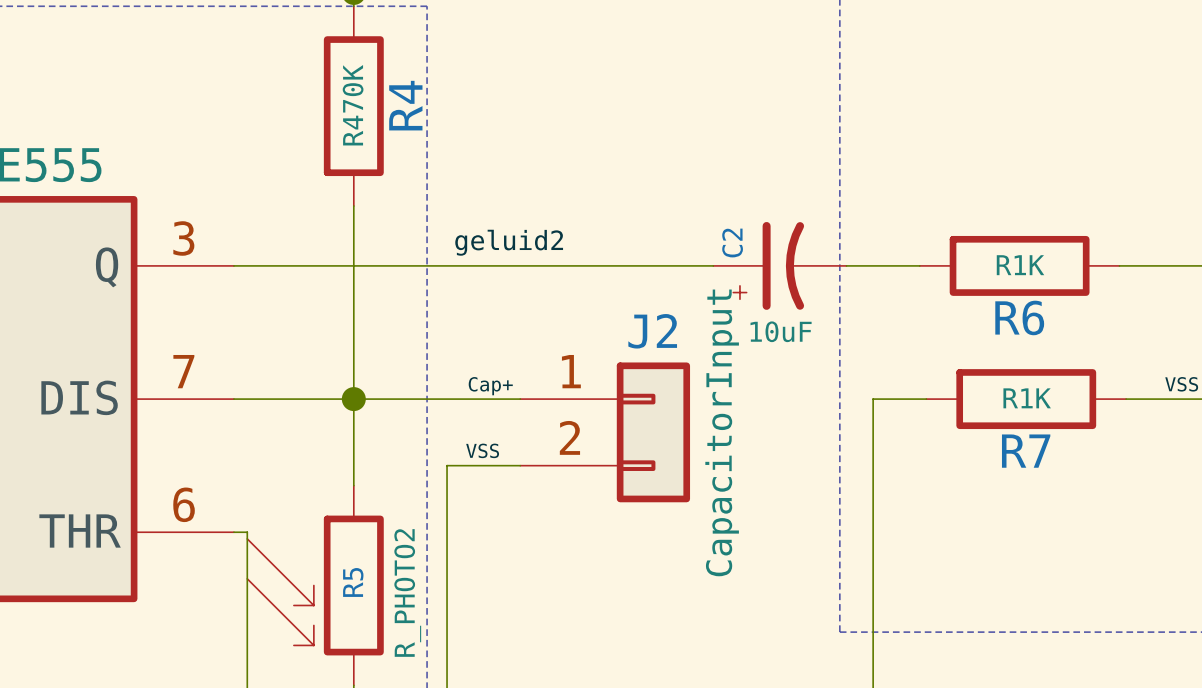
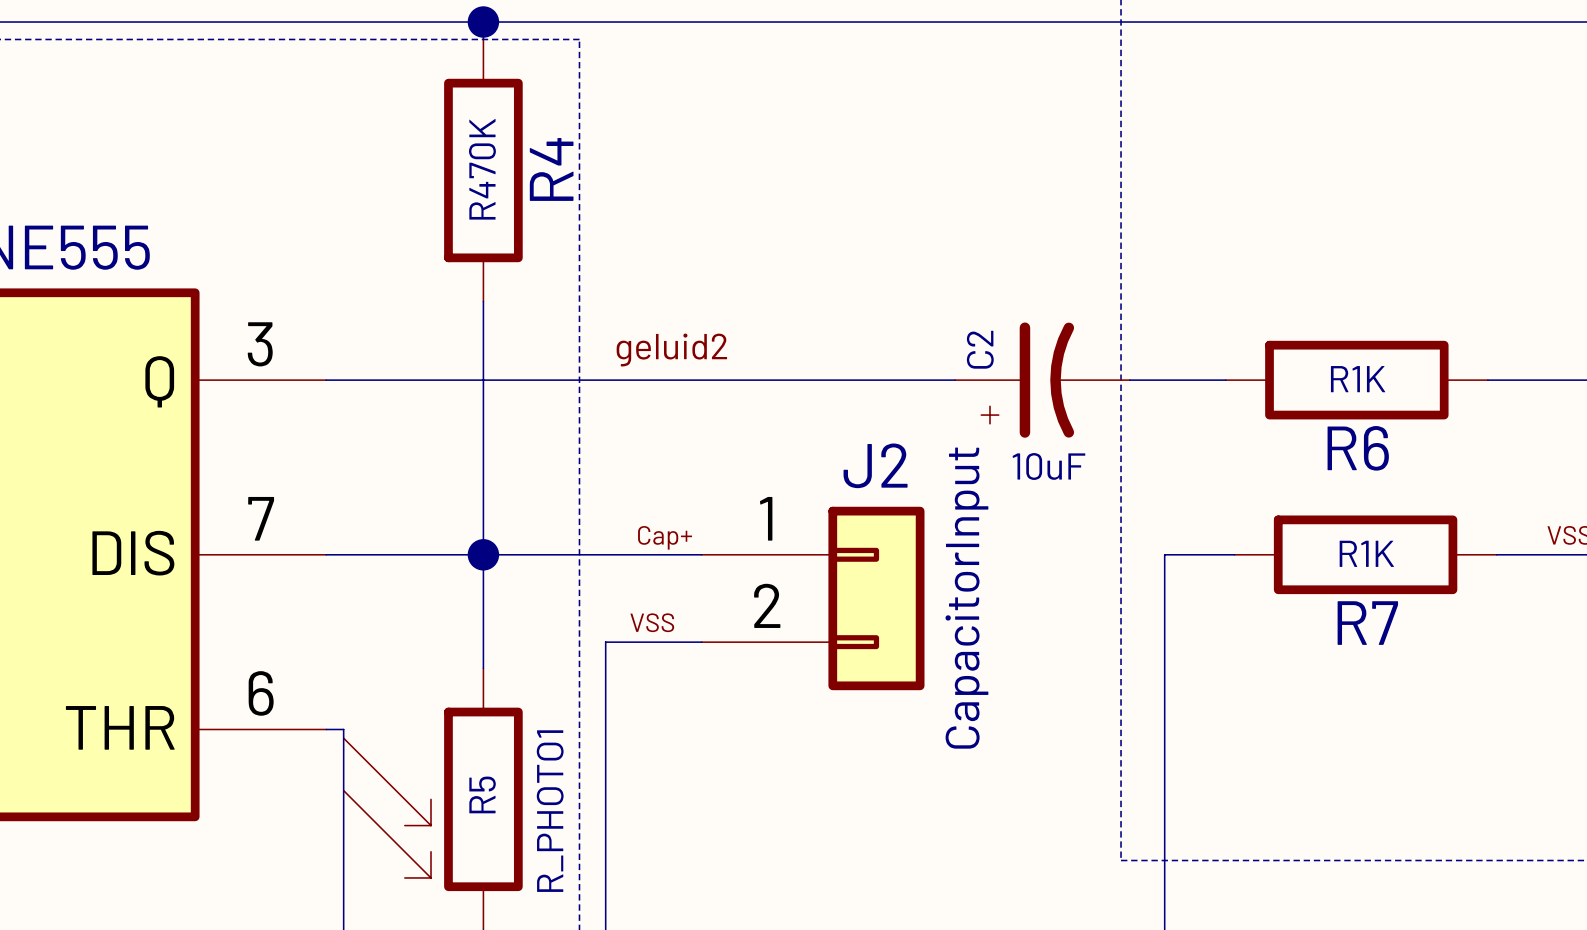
R5 value: R_PHOTO2 (407, 592) -> R_PHOTO1 (550, 811)

